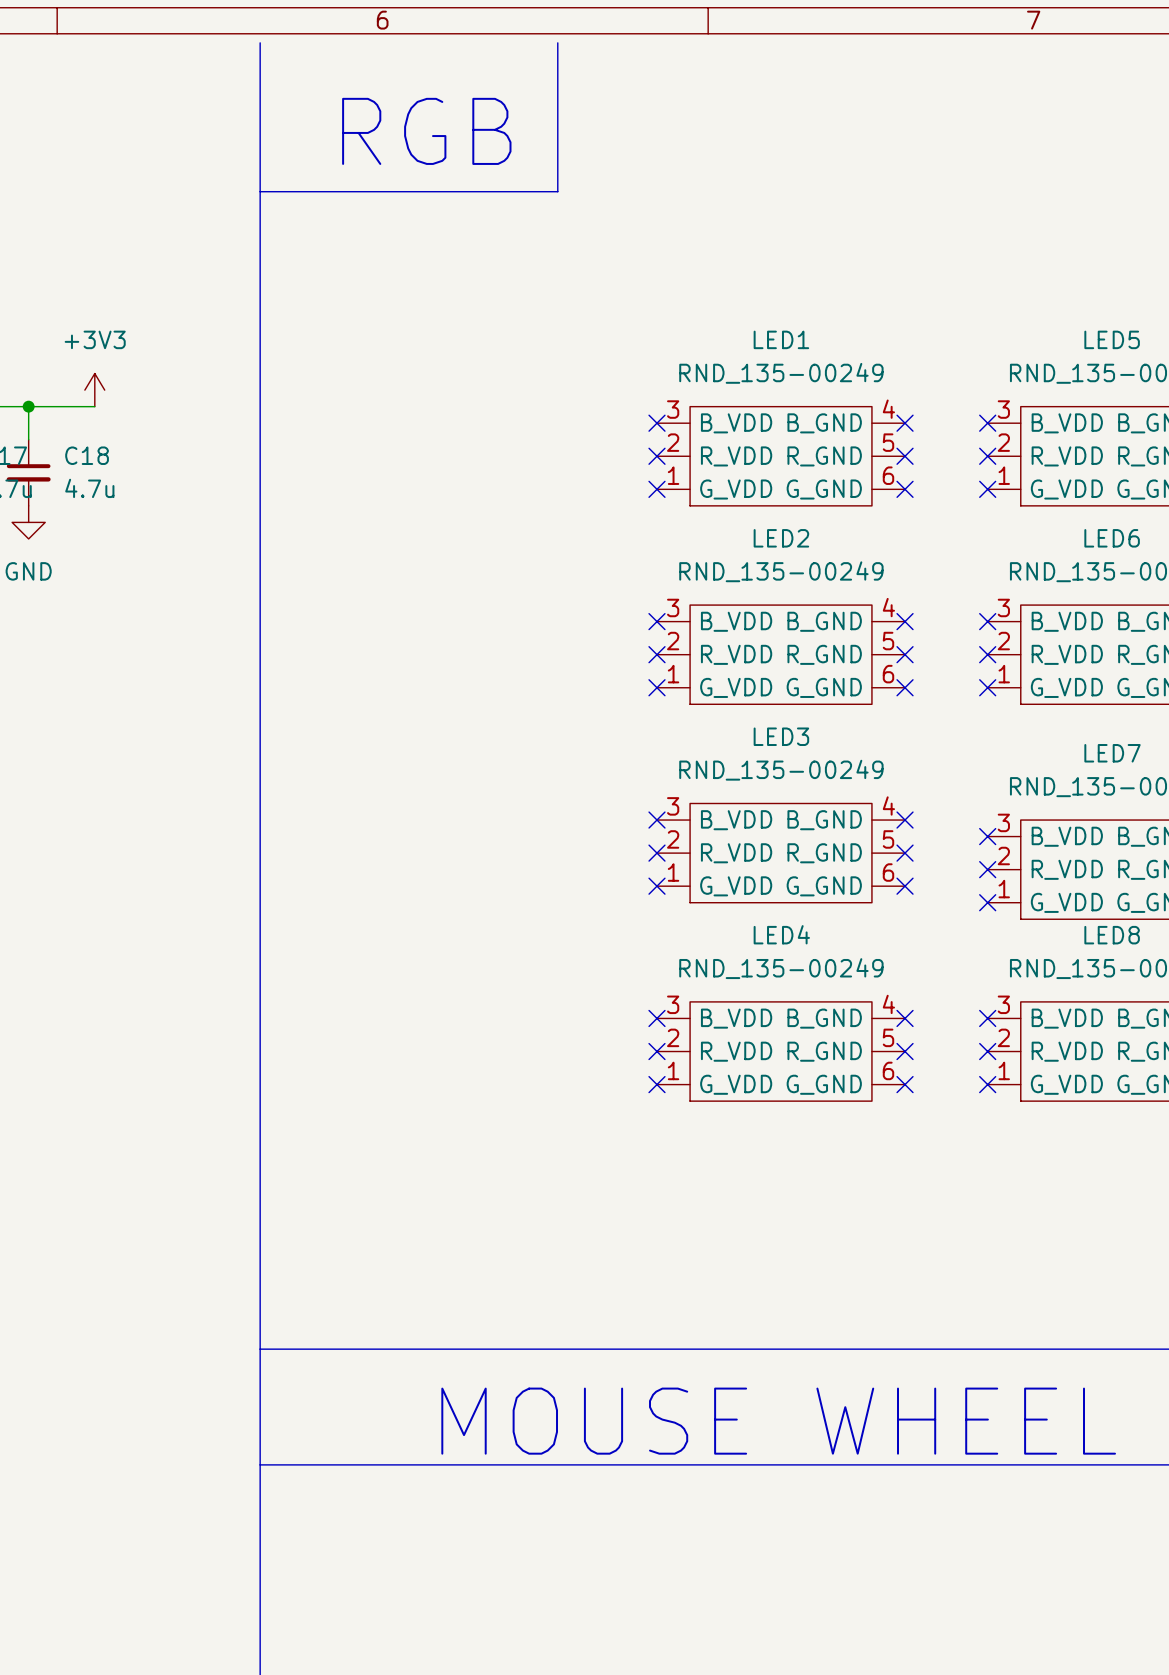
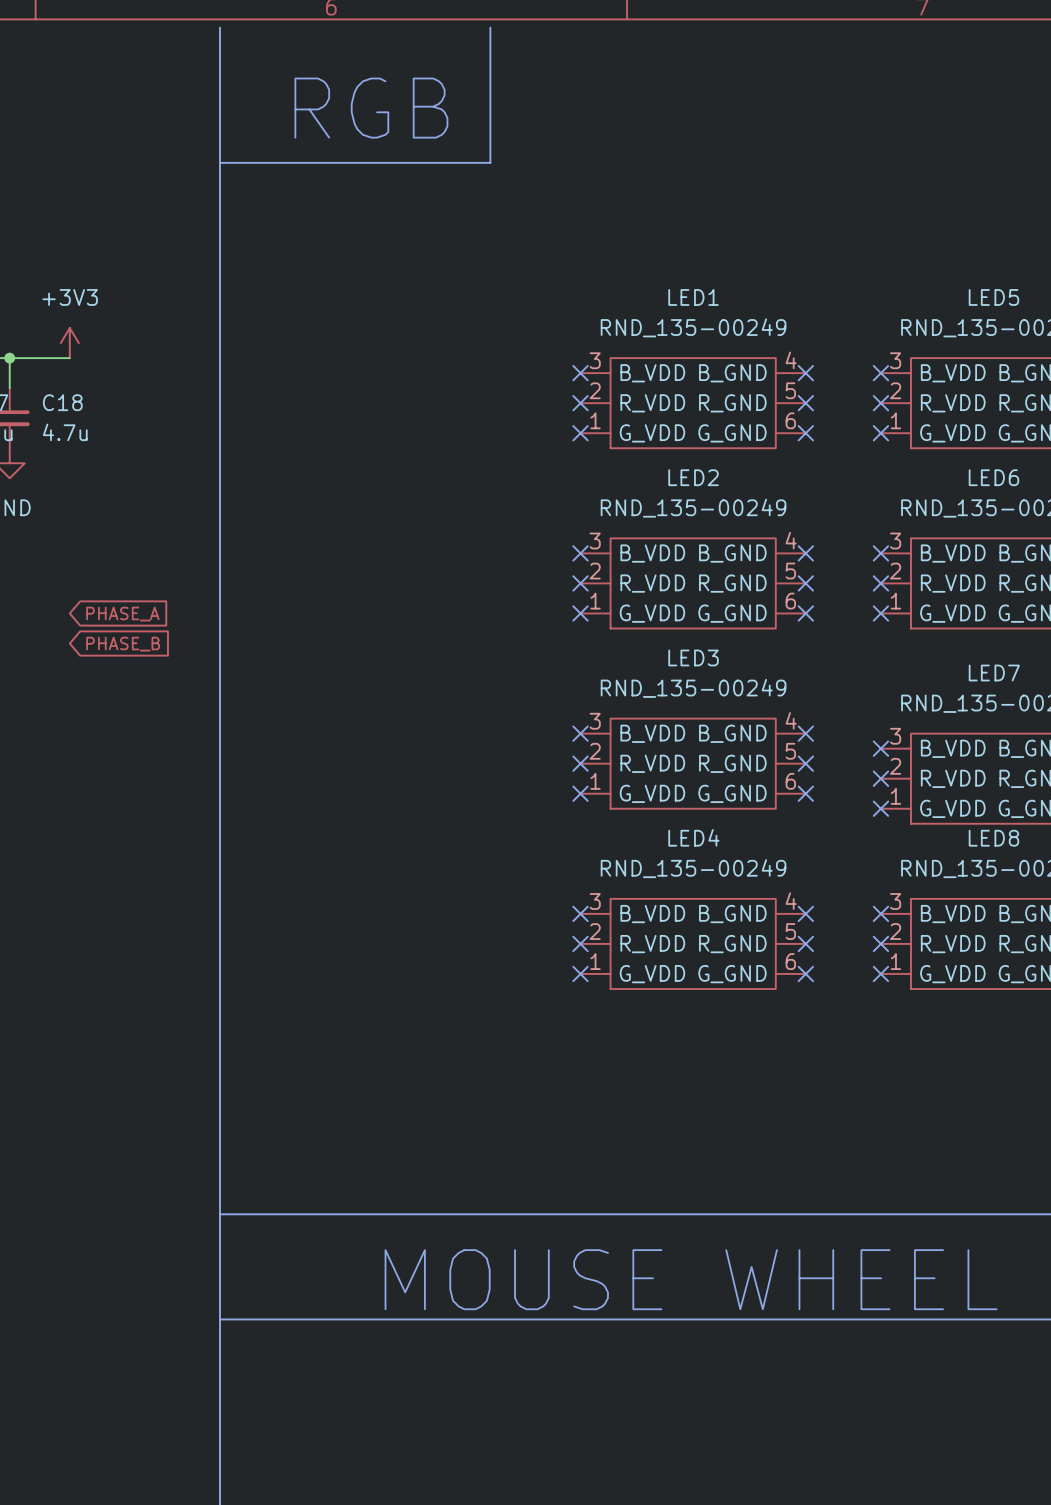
global label: none -> PHASE_A (122, 614)
global label: none -> PHASE_B (123, 644)

